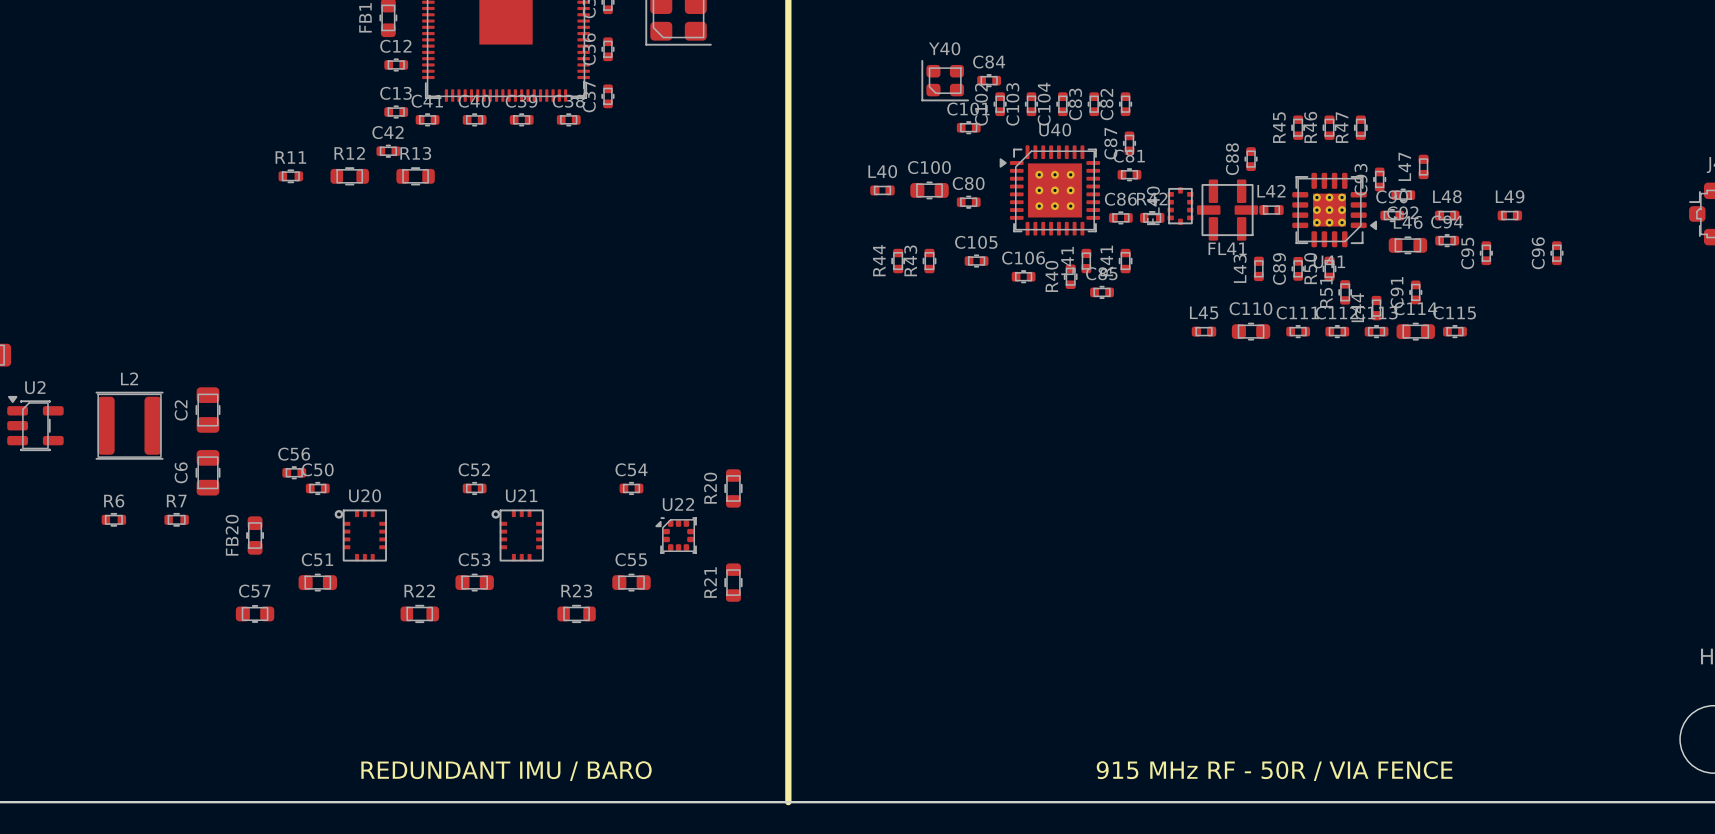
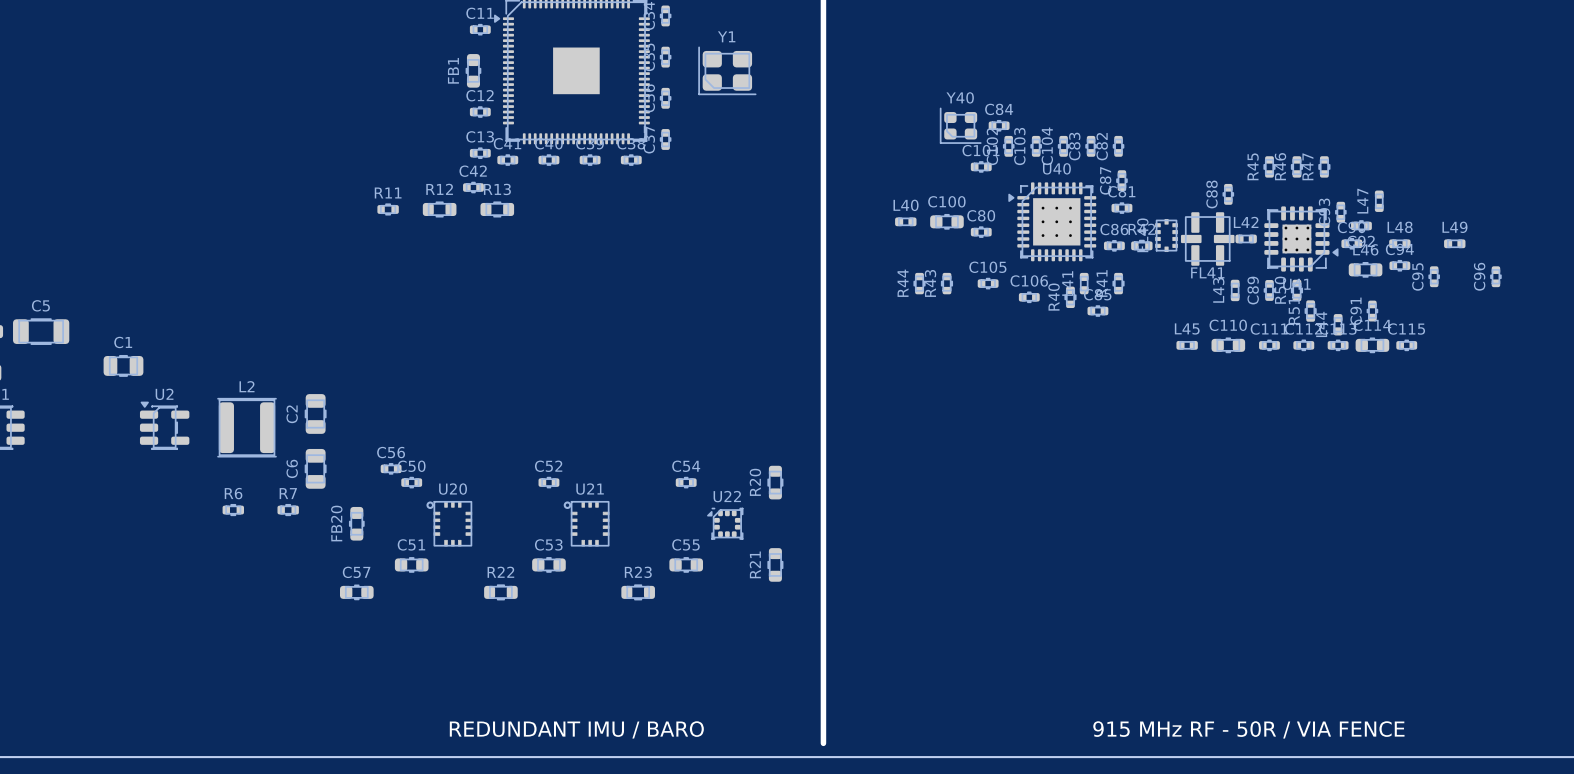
line: (788, 786) (788, 802) -> none

